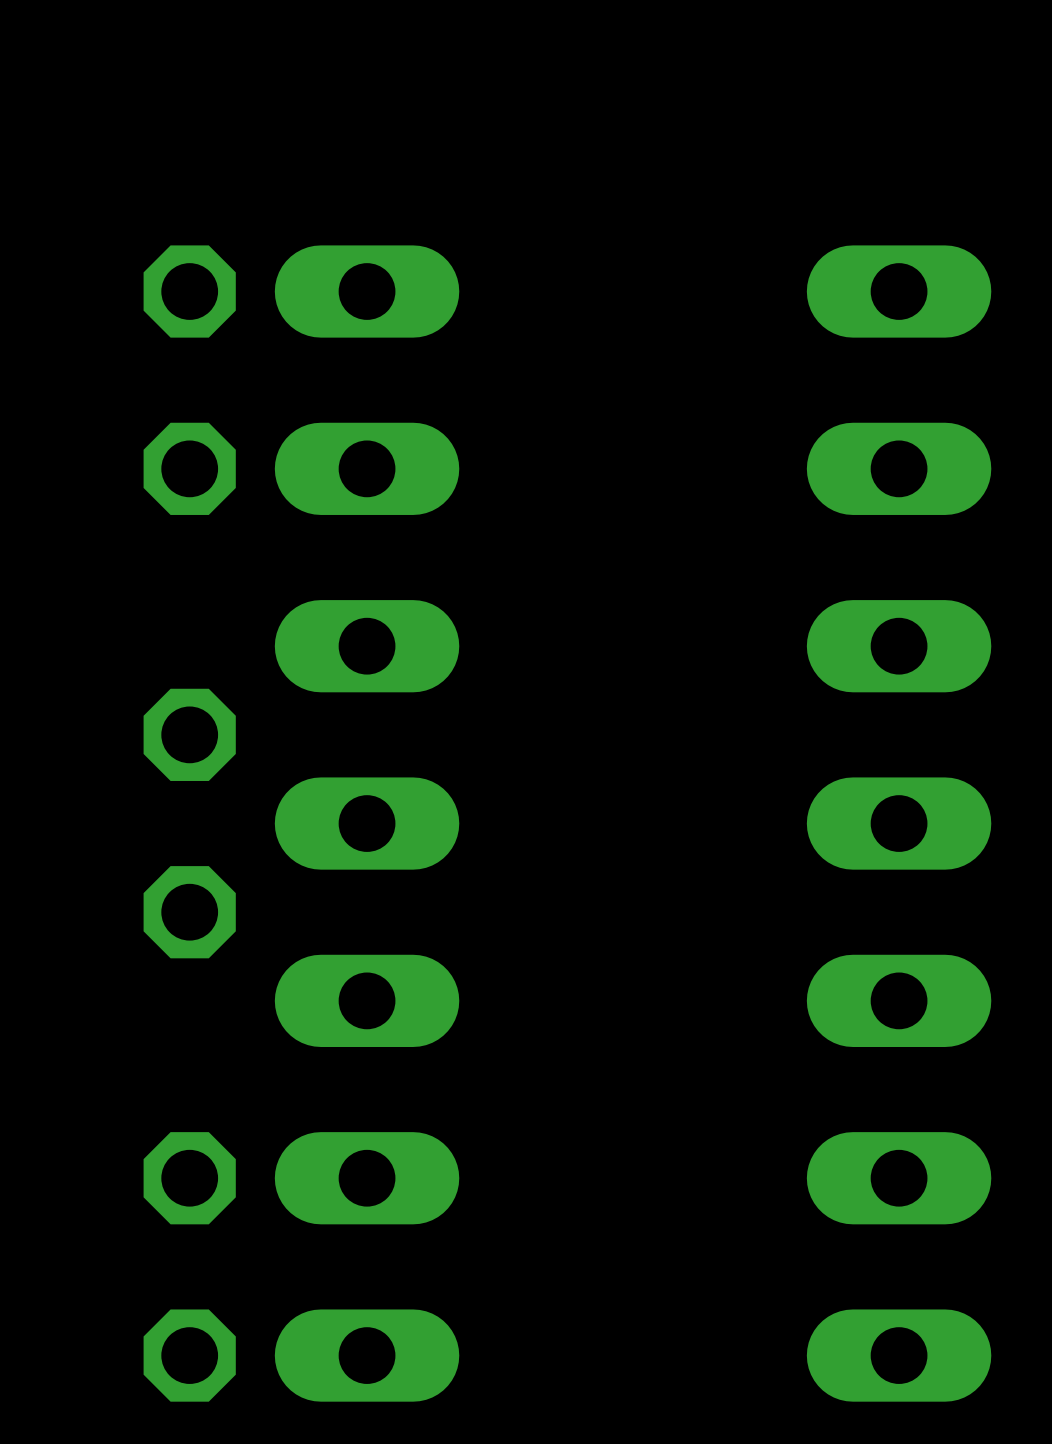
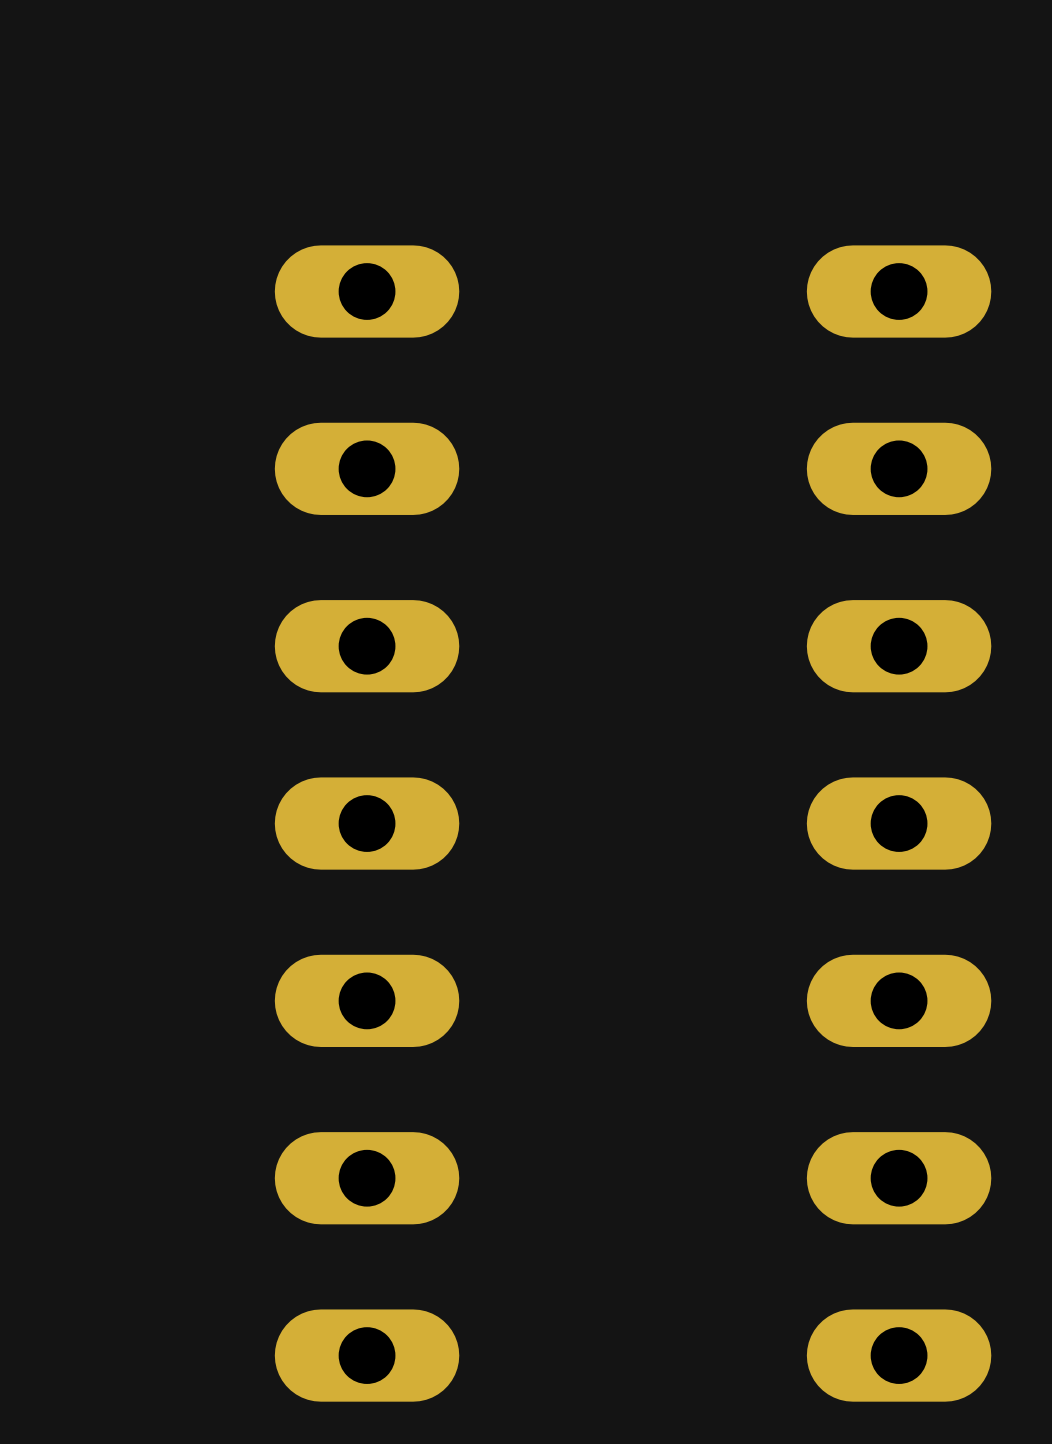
part: (189, 380) -> none
part: (189, 823) -> none
part: (189, 1266) -> none

